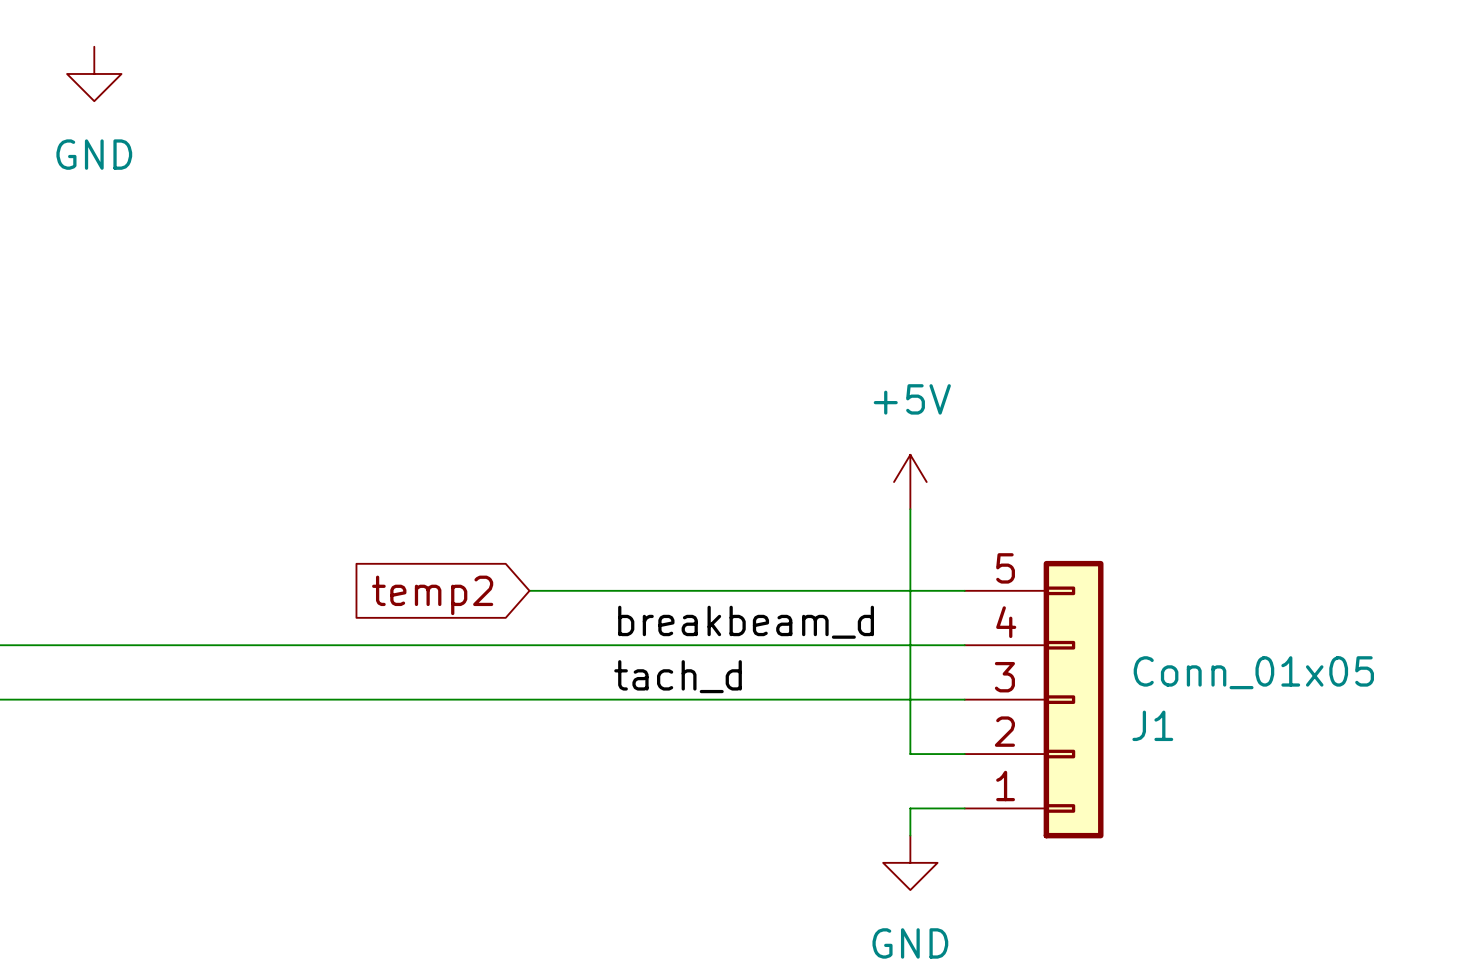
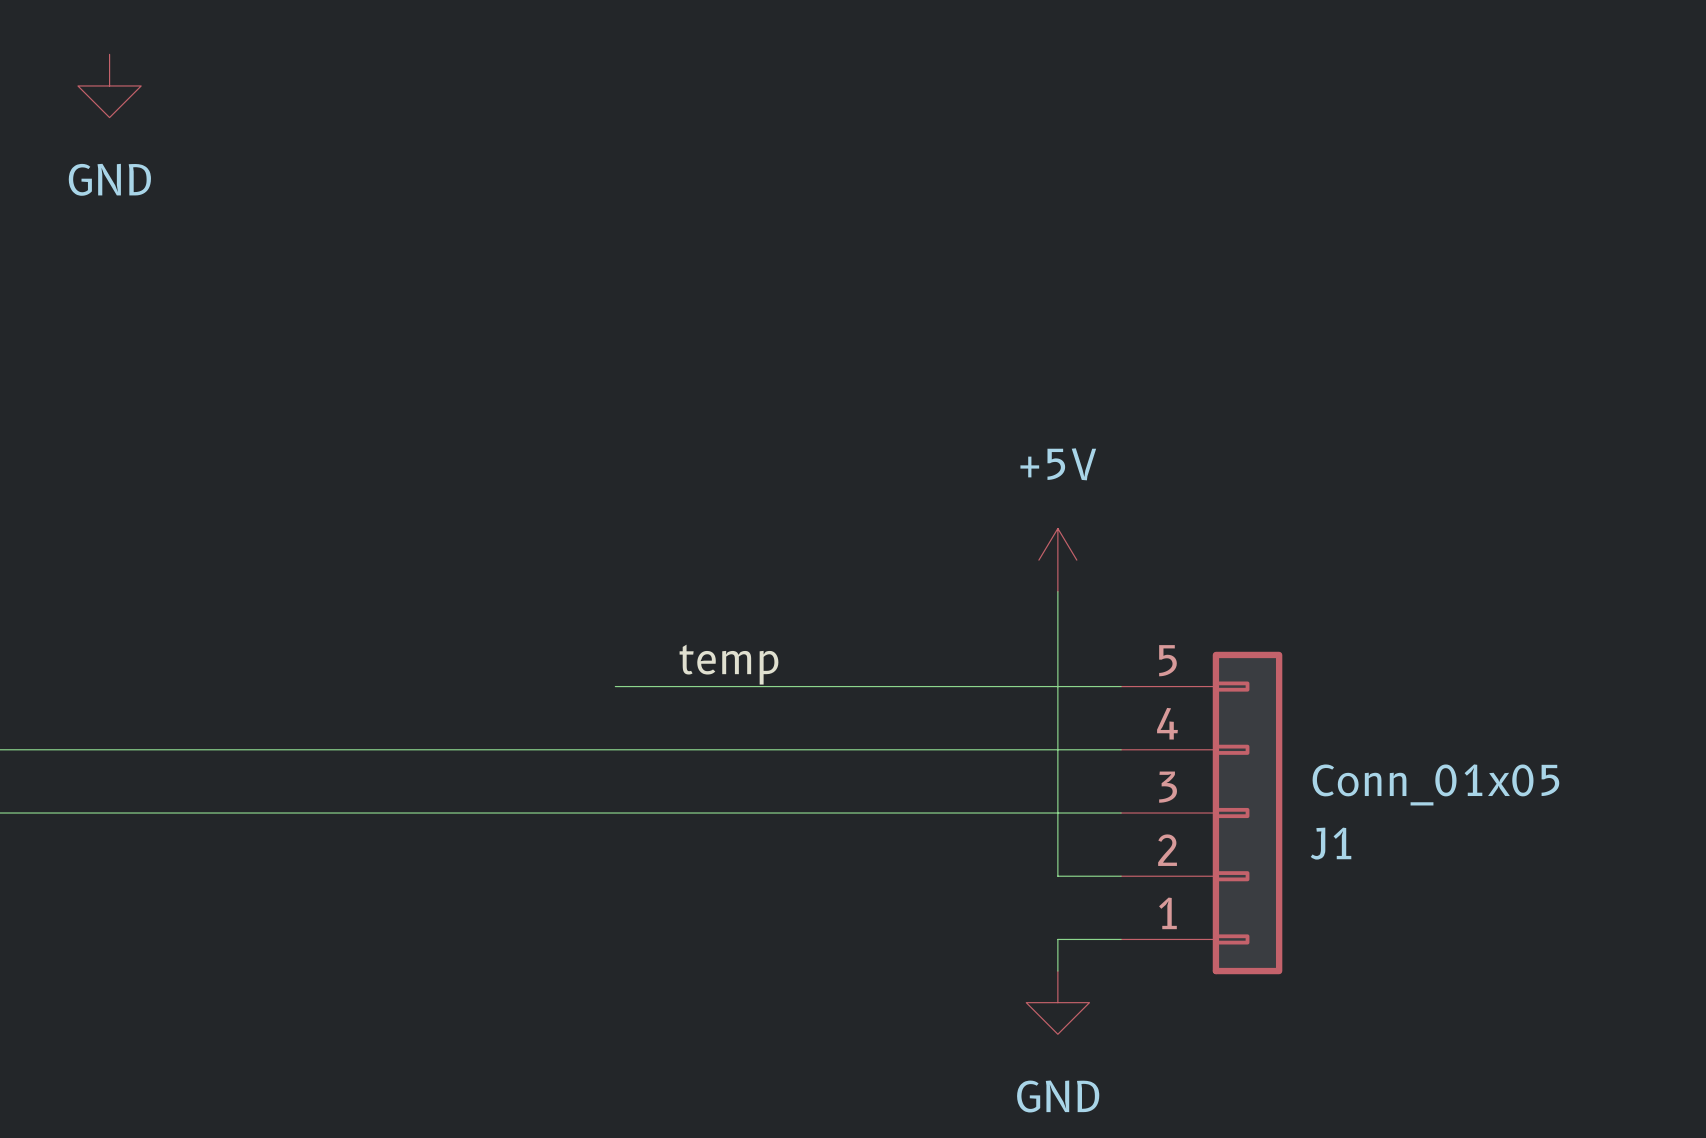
label: none -> temp (728, 664)
global label: temp2 (432, 595) -> none
label: breakbeam_d (746, 622) -> none
label: tach_d (678, 676) -> none

